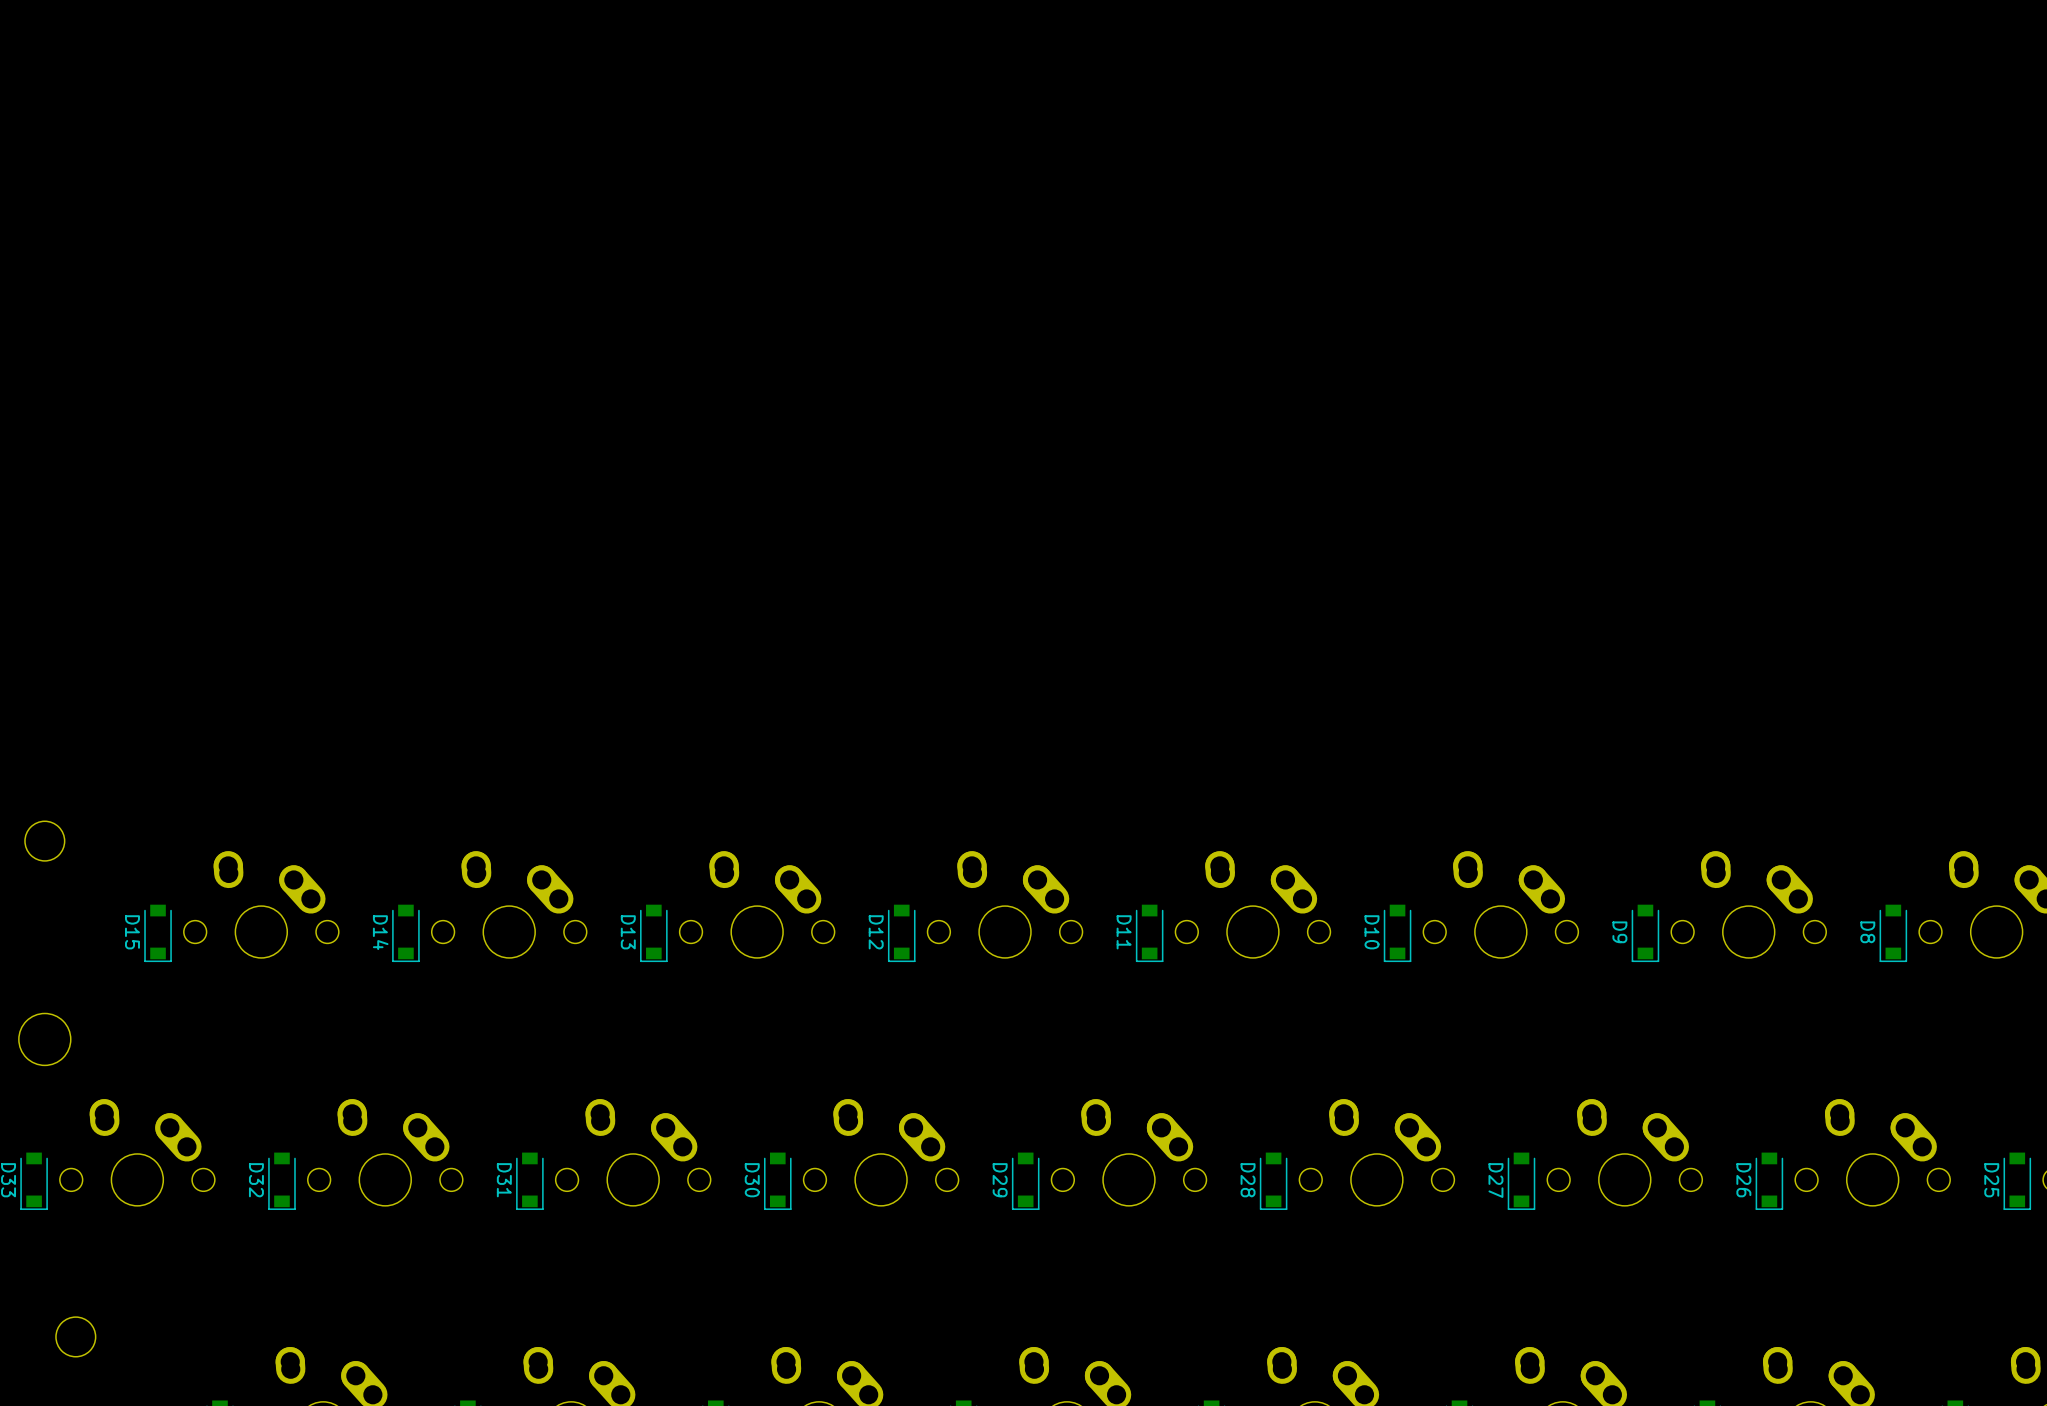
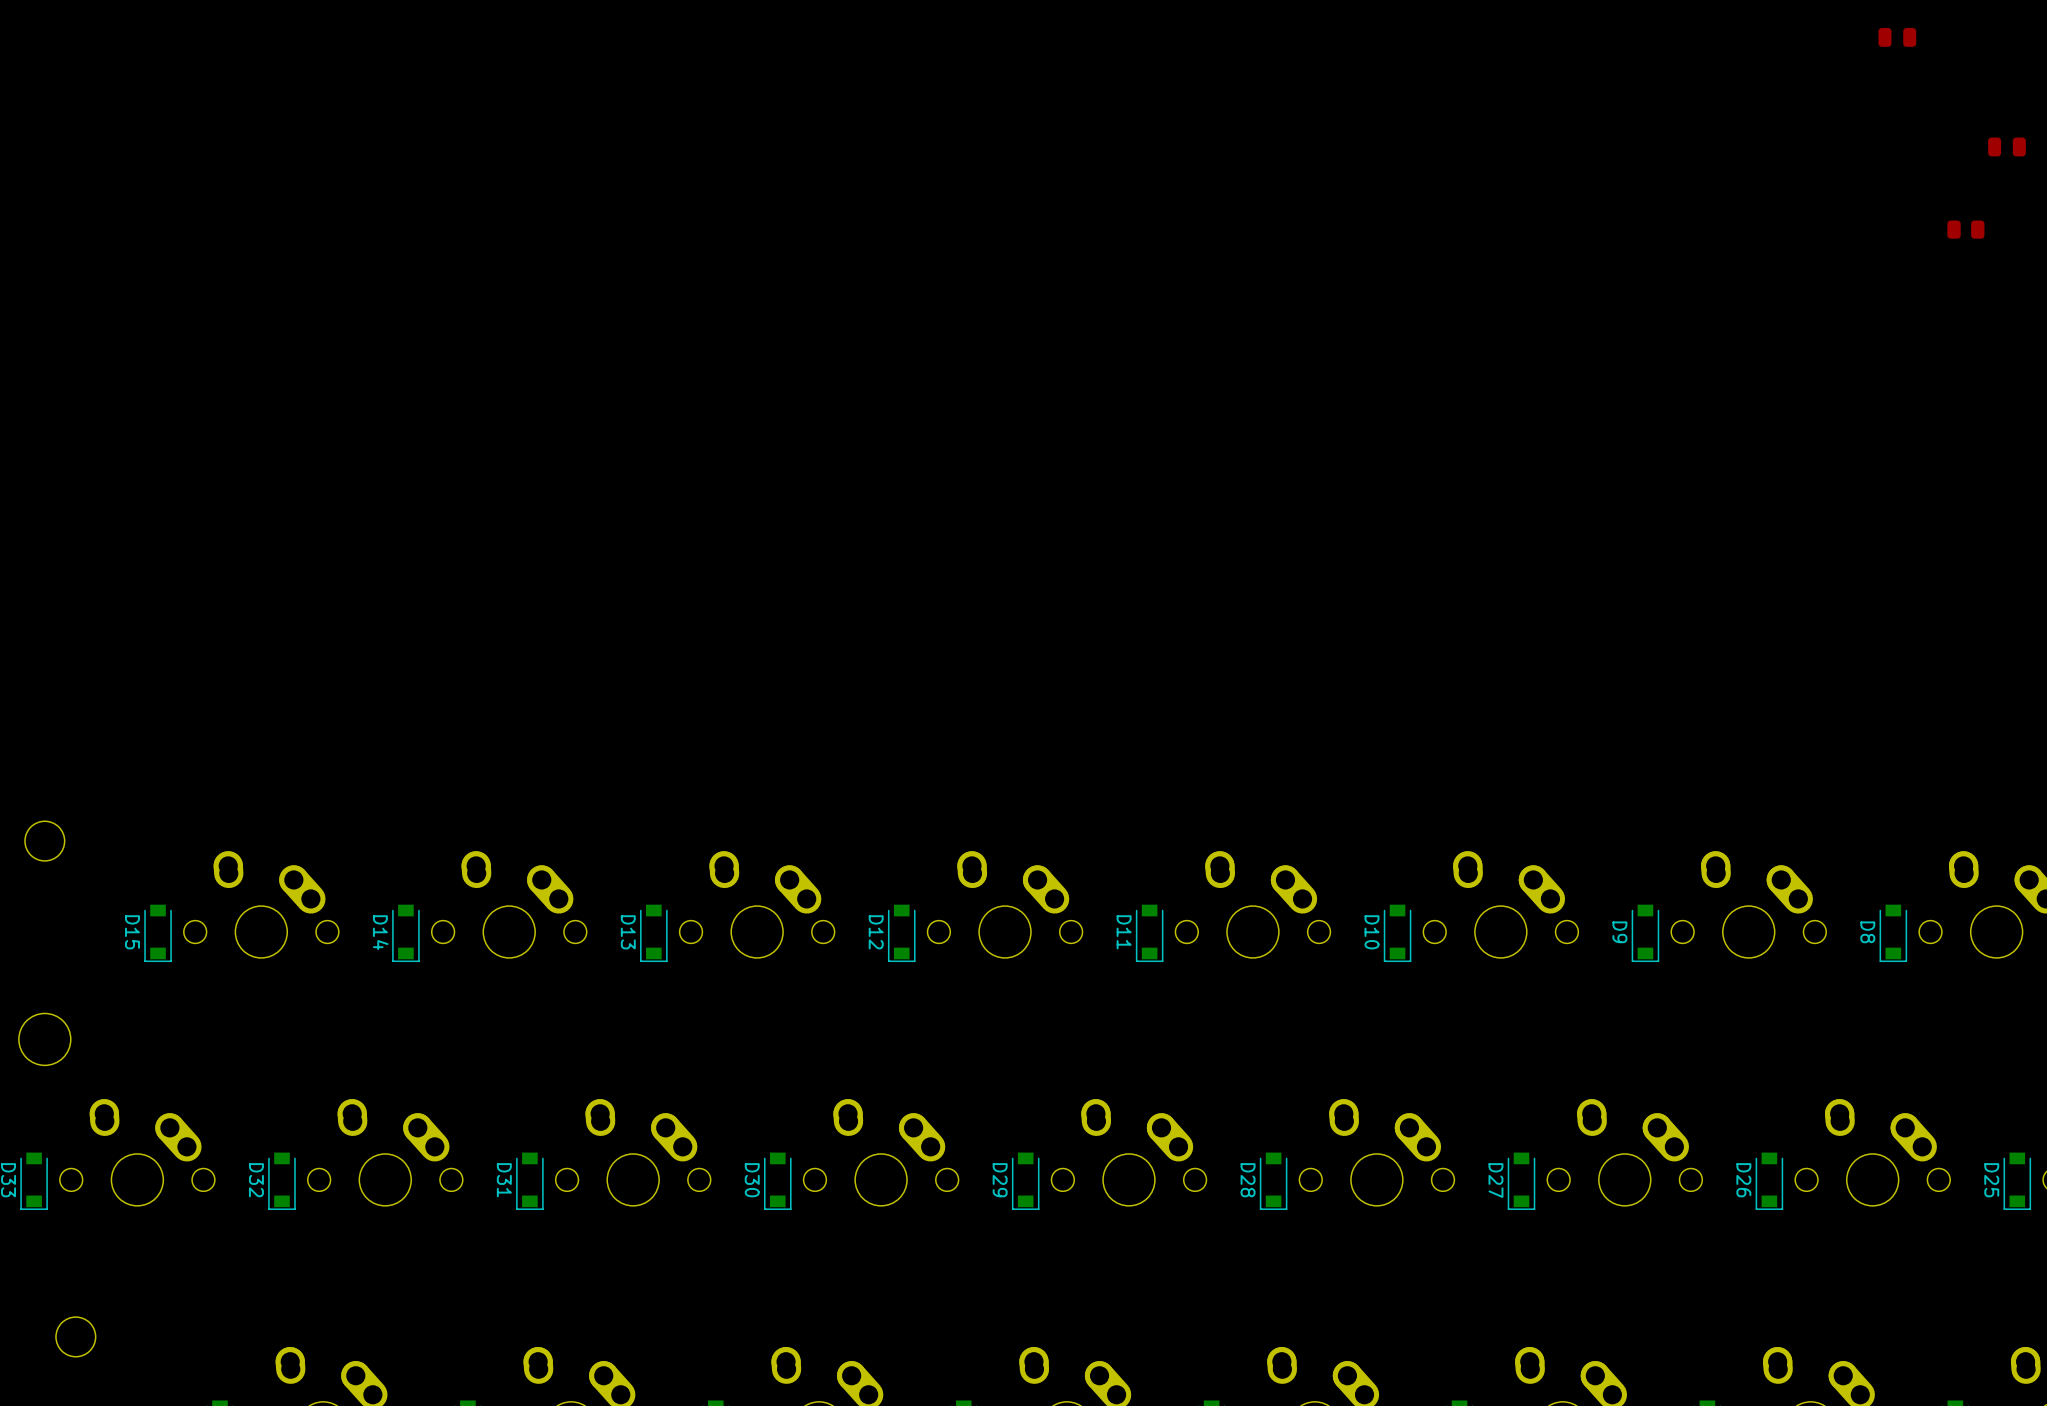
part: none -> (1897, 37)
part: none -> (2006, 146)
part: none -> (1965, 229)

